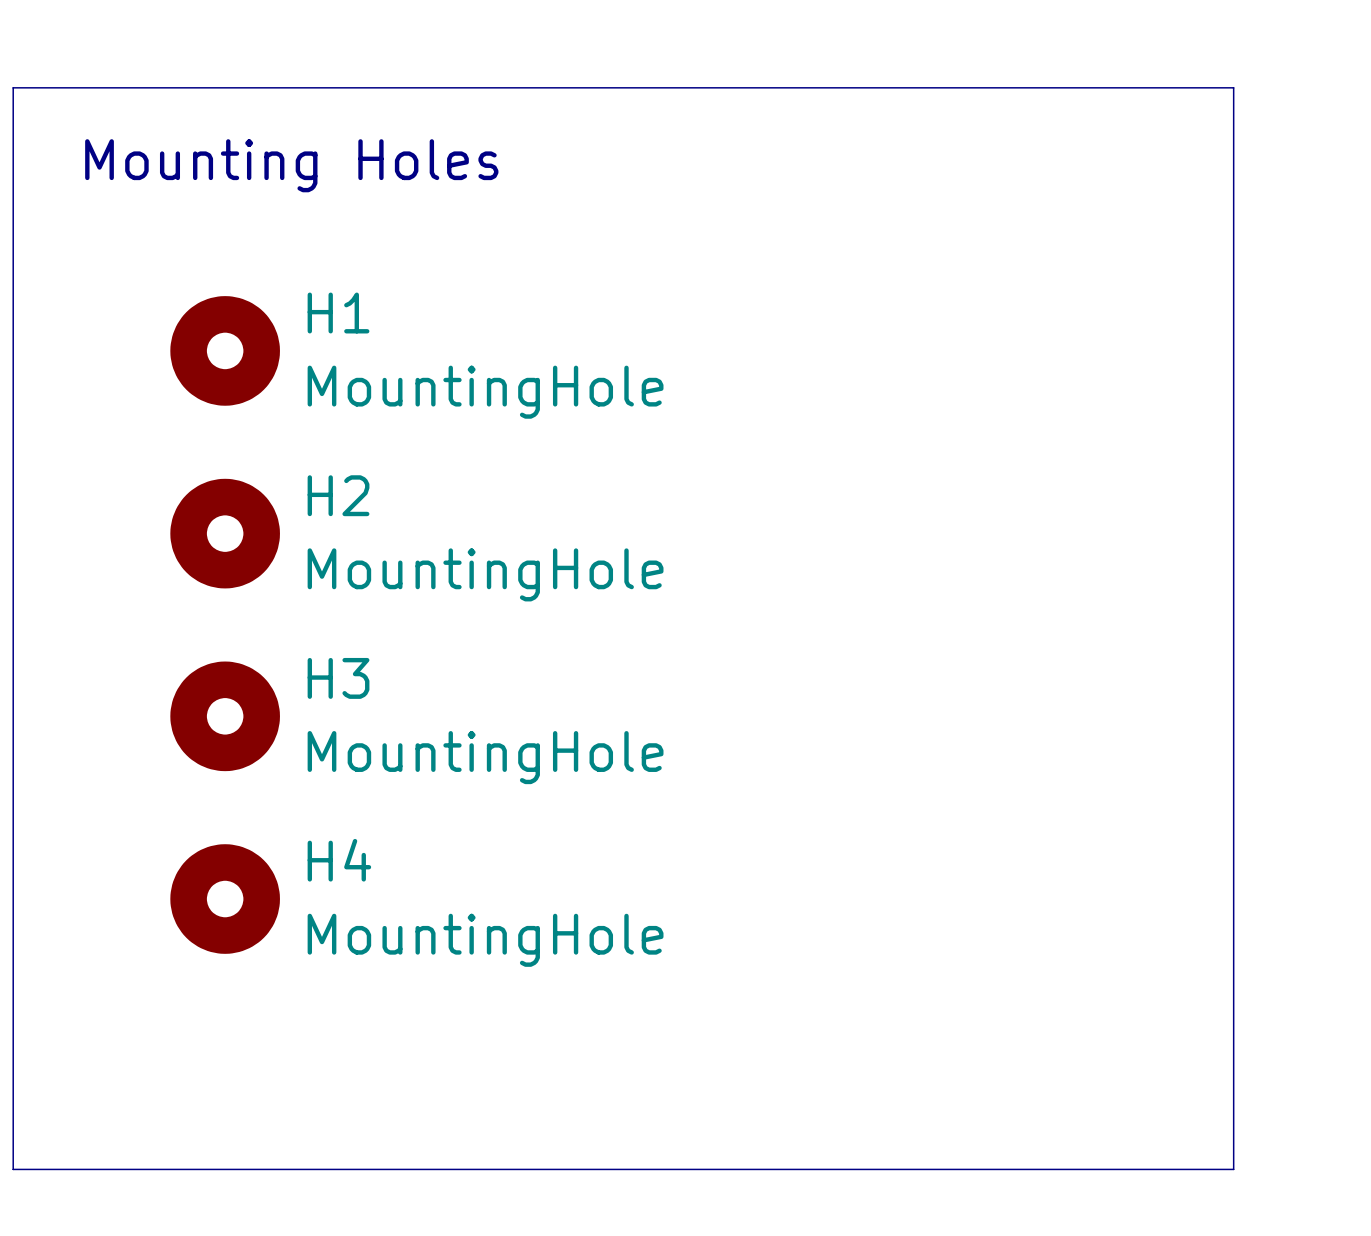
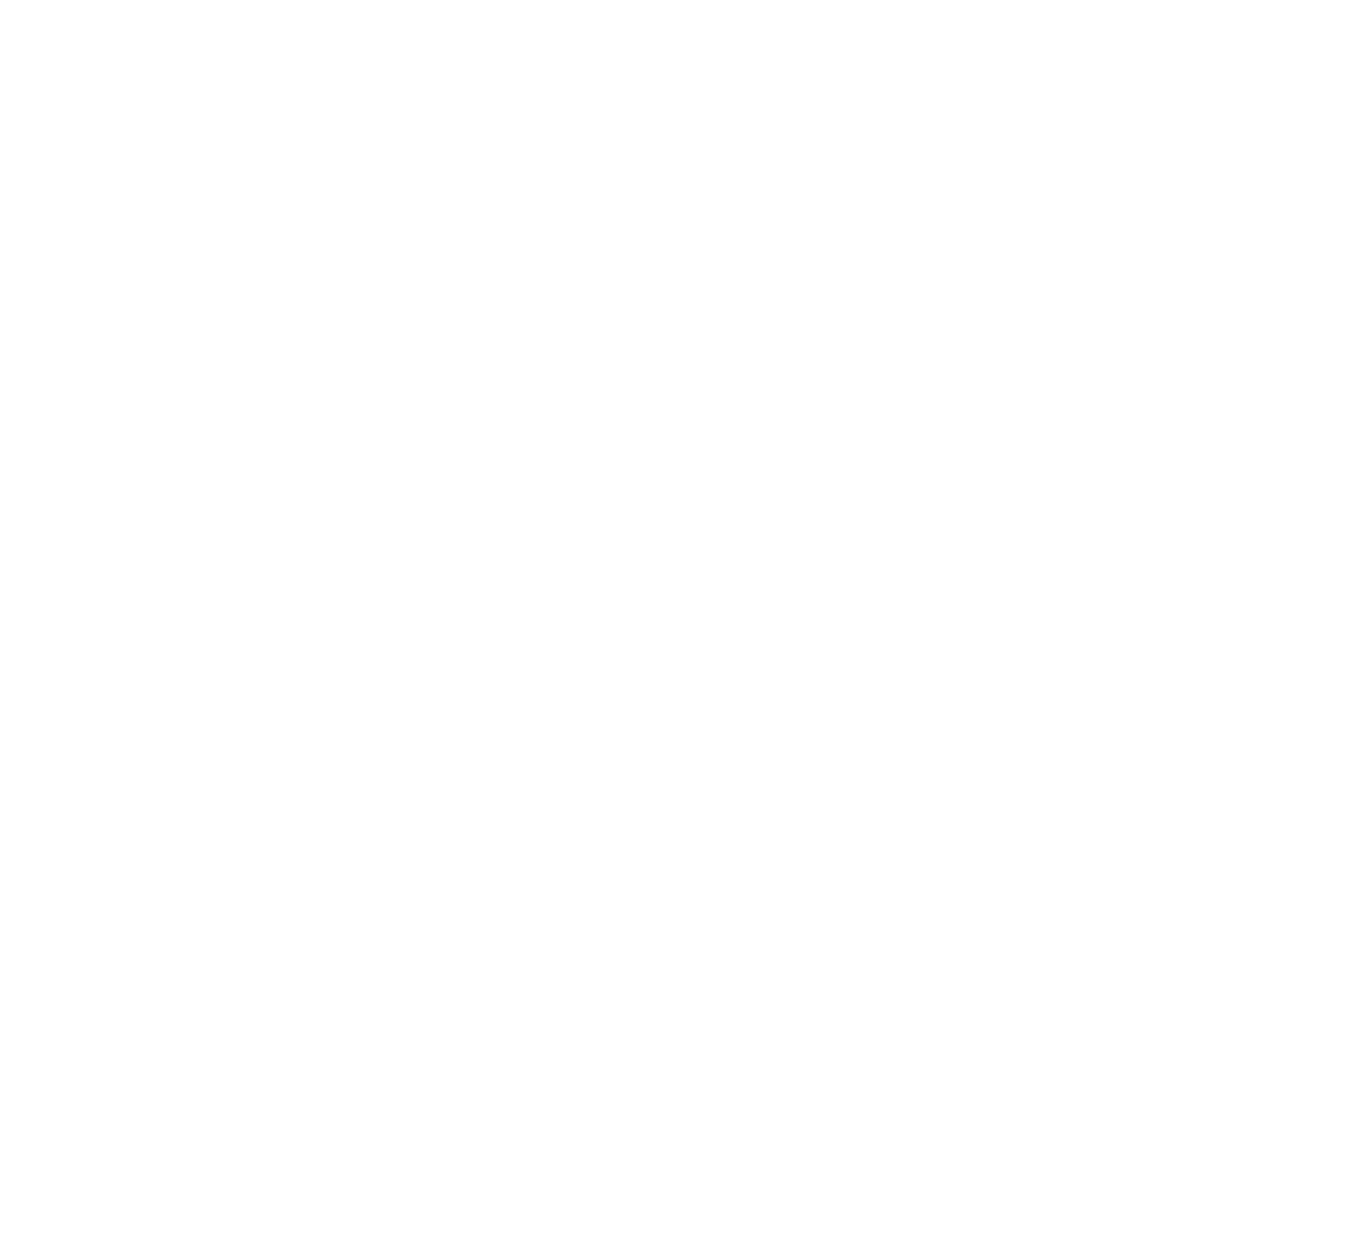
line: (13, 87) (1233, 87) (1233, 1169) (13, 1169) (13, 87) -> none
text: Mounting Holes (291, 165) -> none
H1: MountingHole (225, 350) -> none
H2: MountingHole (225, 533) -> none
H3: MountingHole (225, 716) -> none
H4: MountingHole (225, 899) -> none

